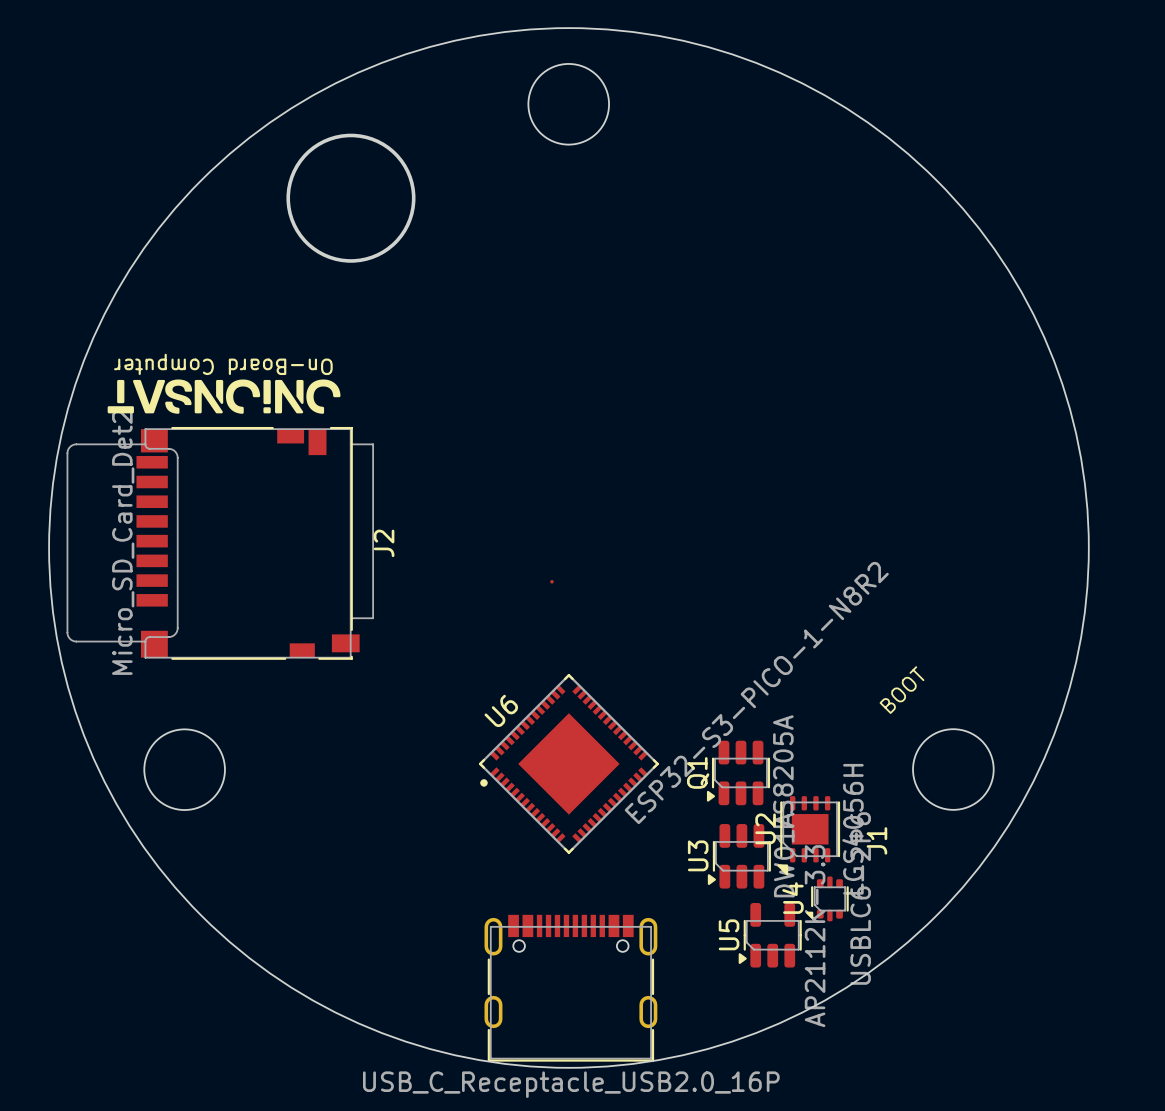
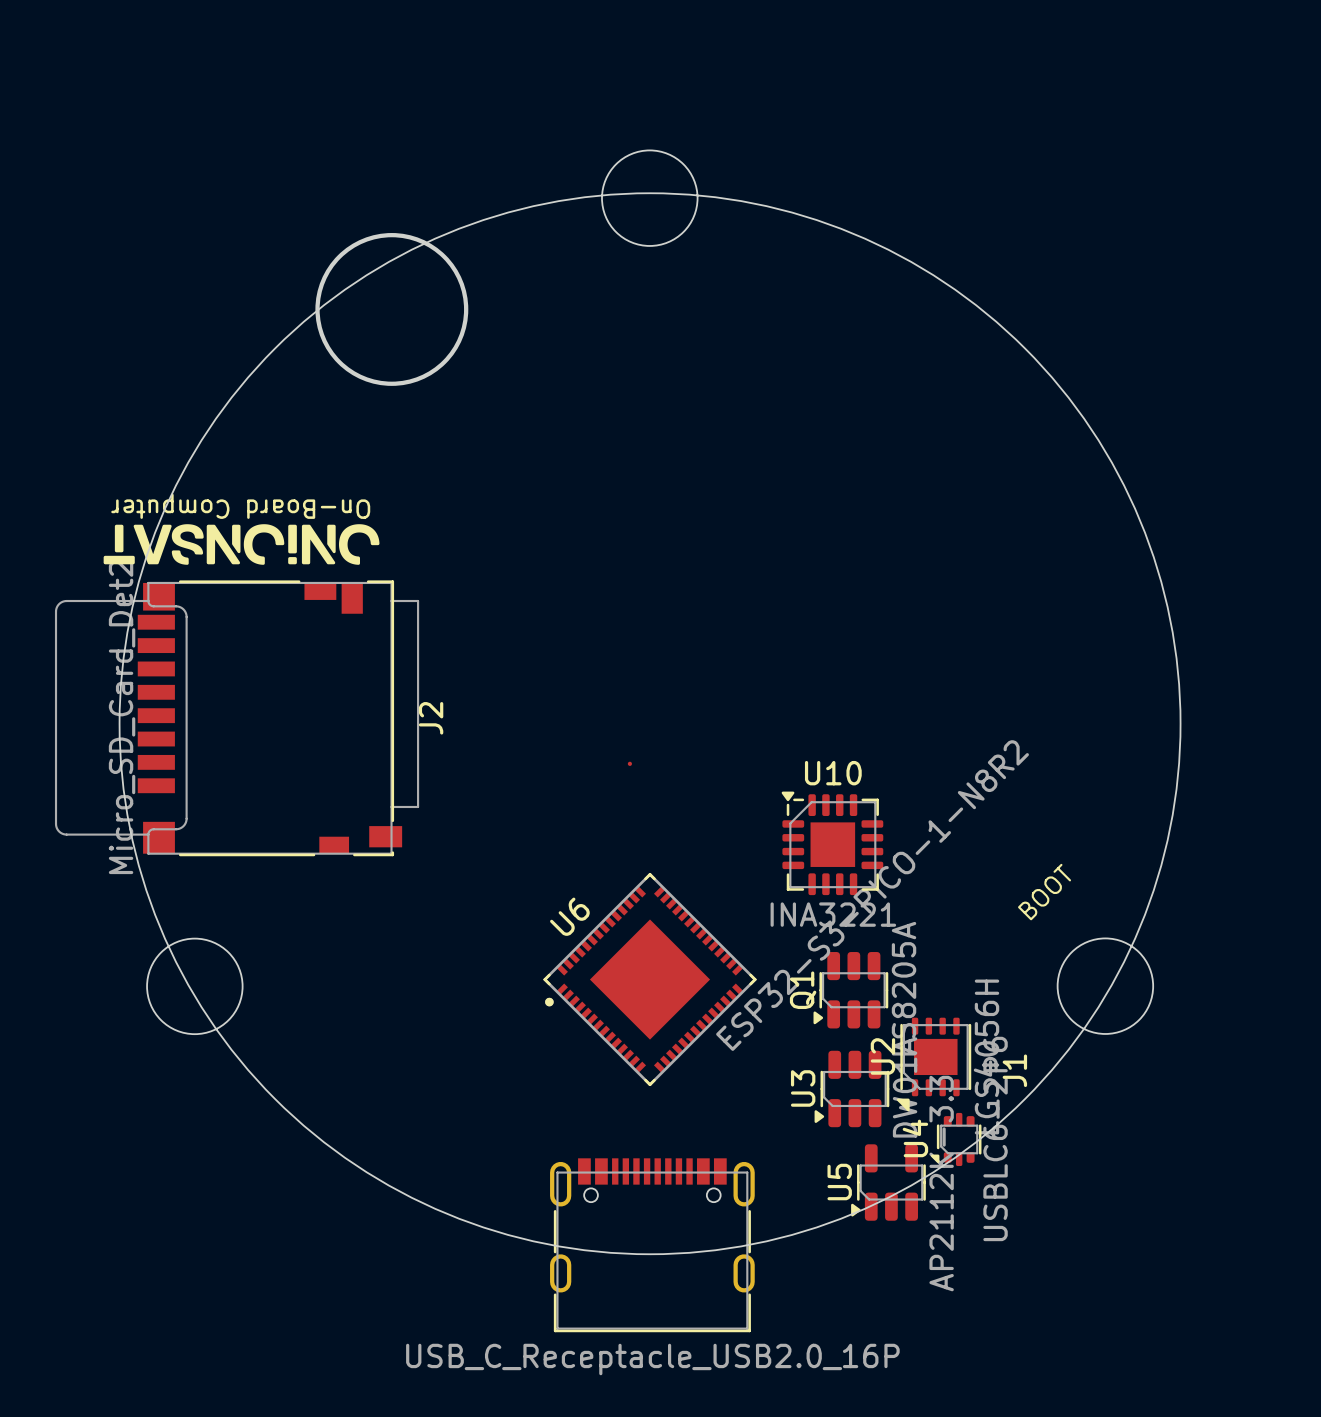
round board edge size: [48, 27, 1090, 1069] -> [119, 192, 1182, 1255]
U10: none -> INA3221 (832, 843)

